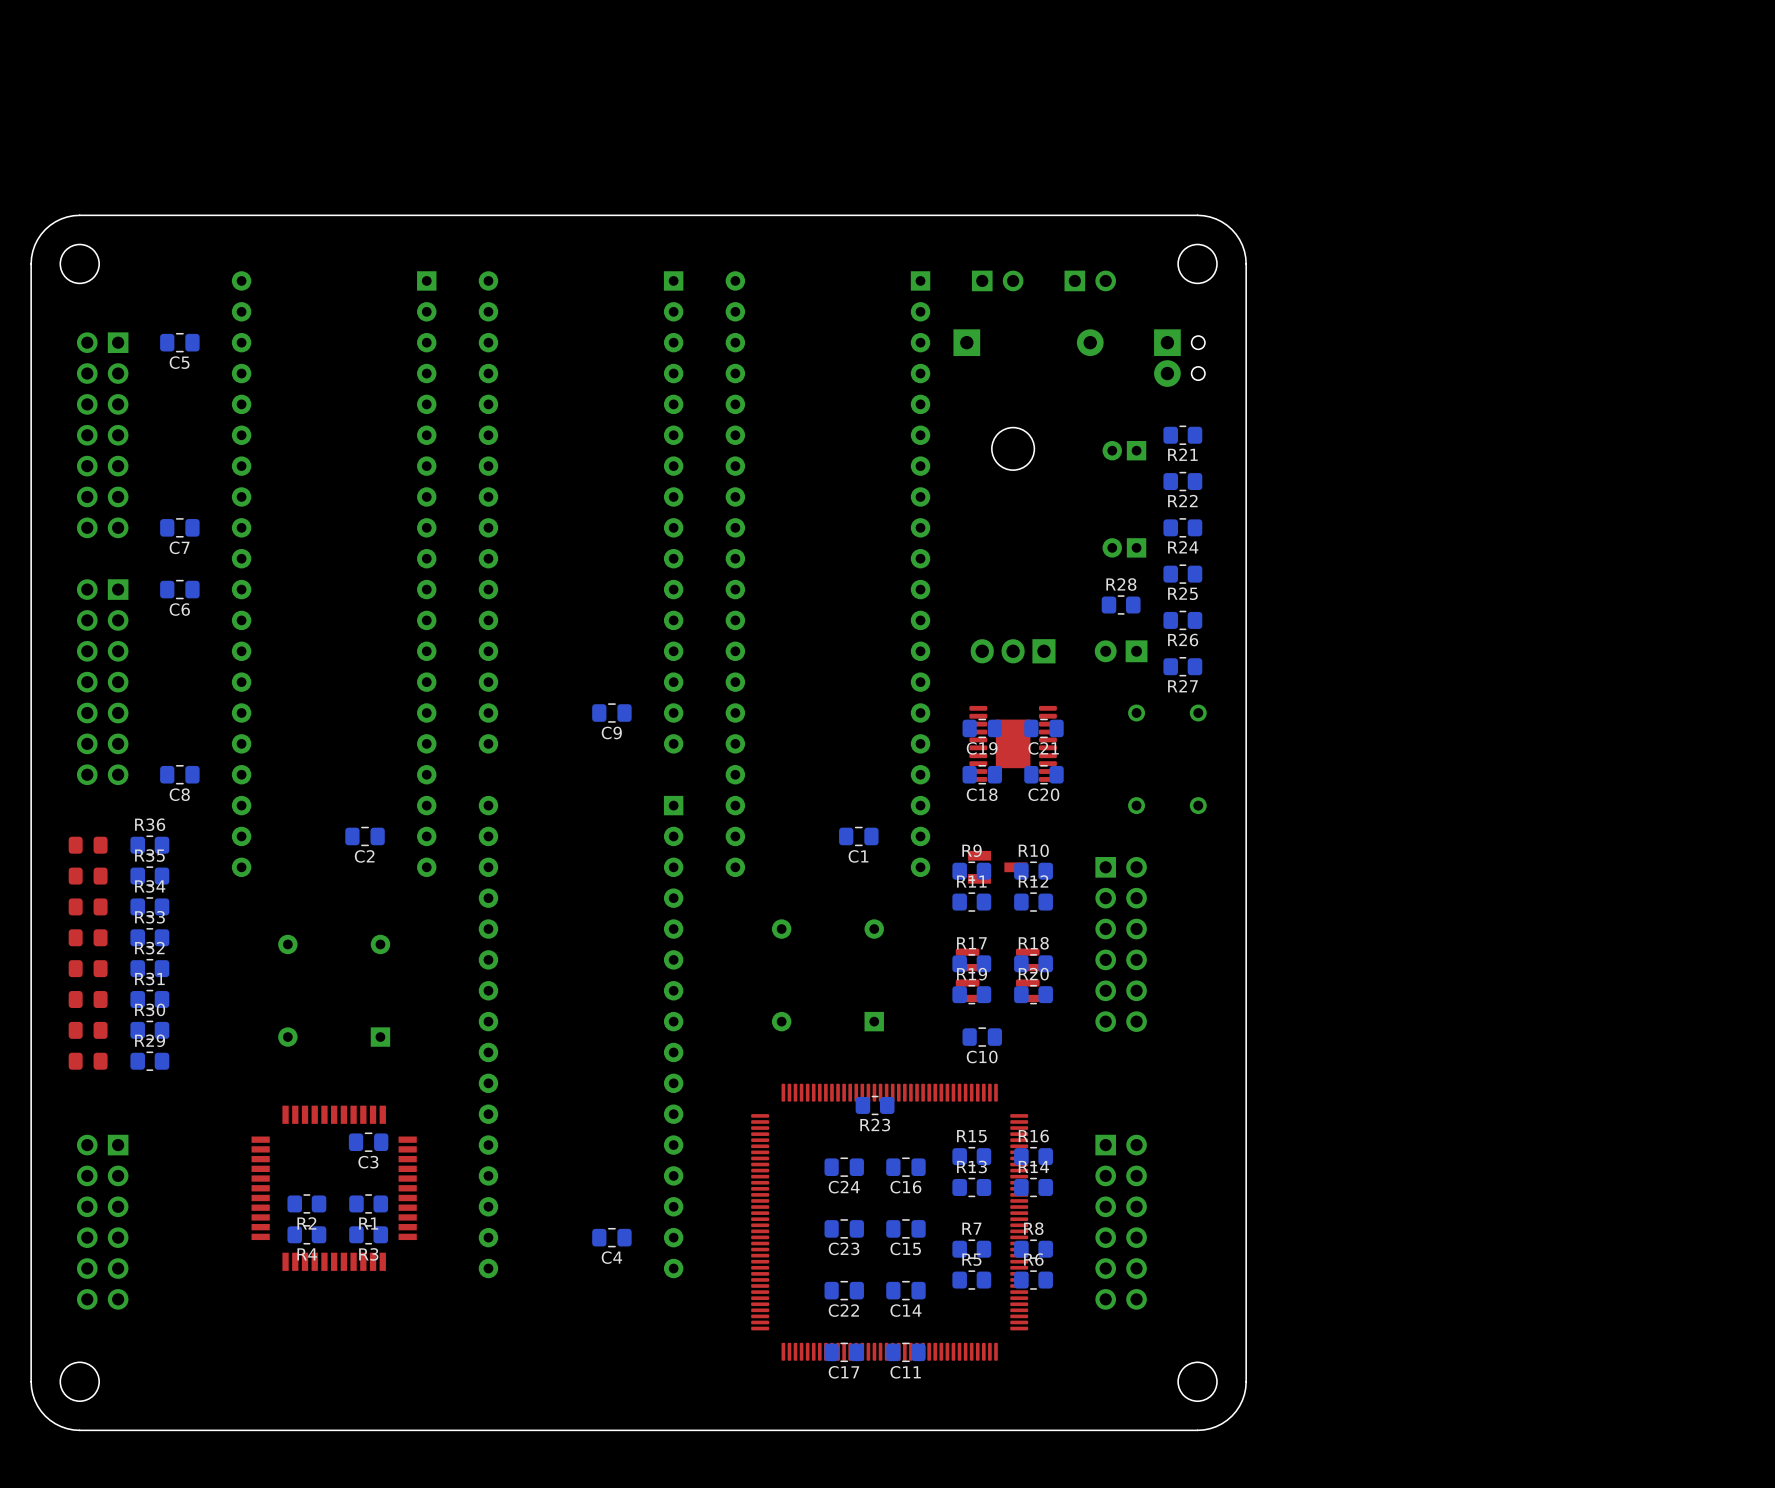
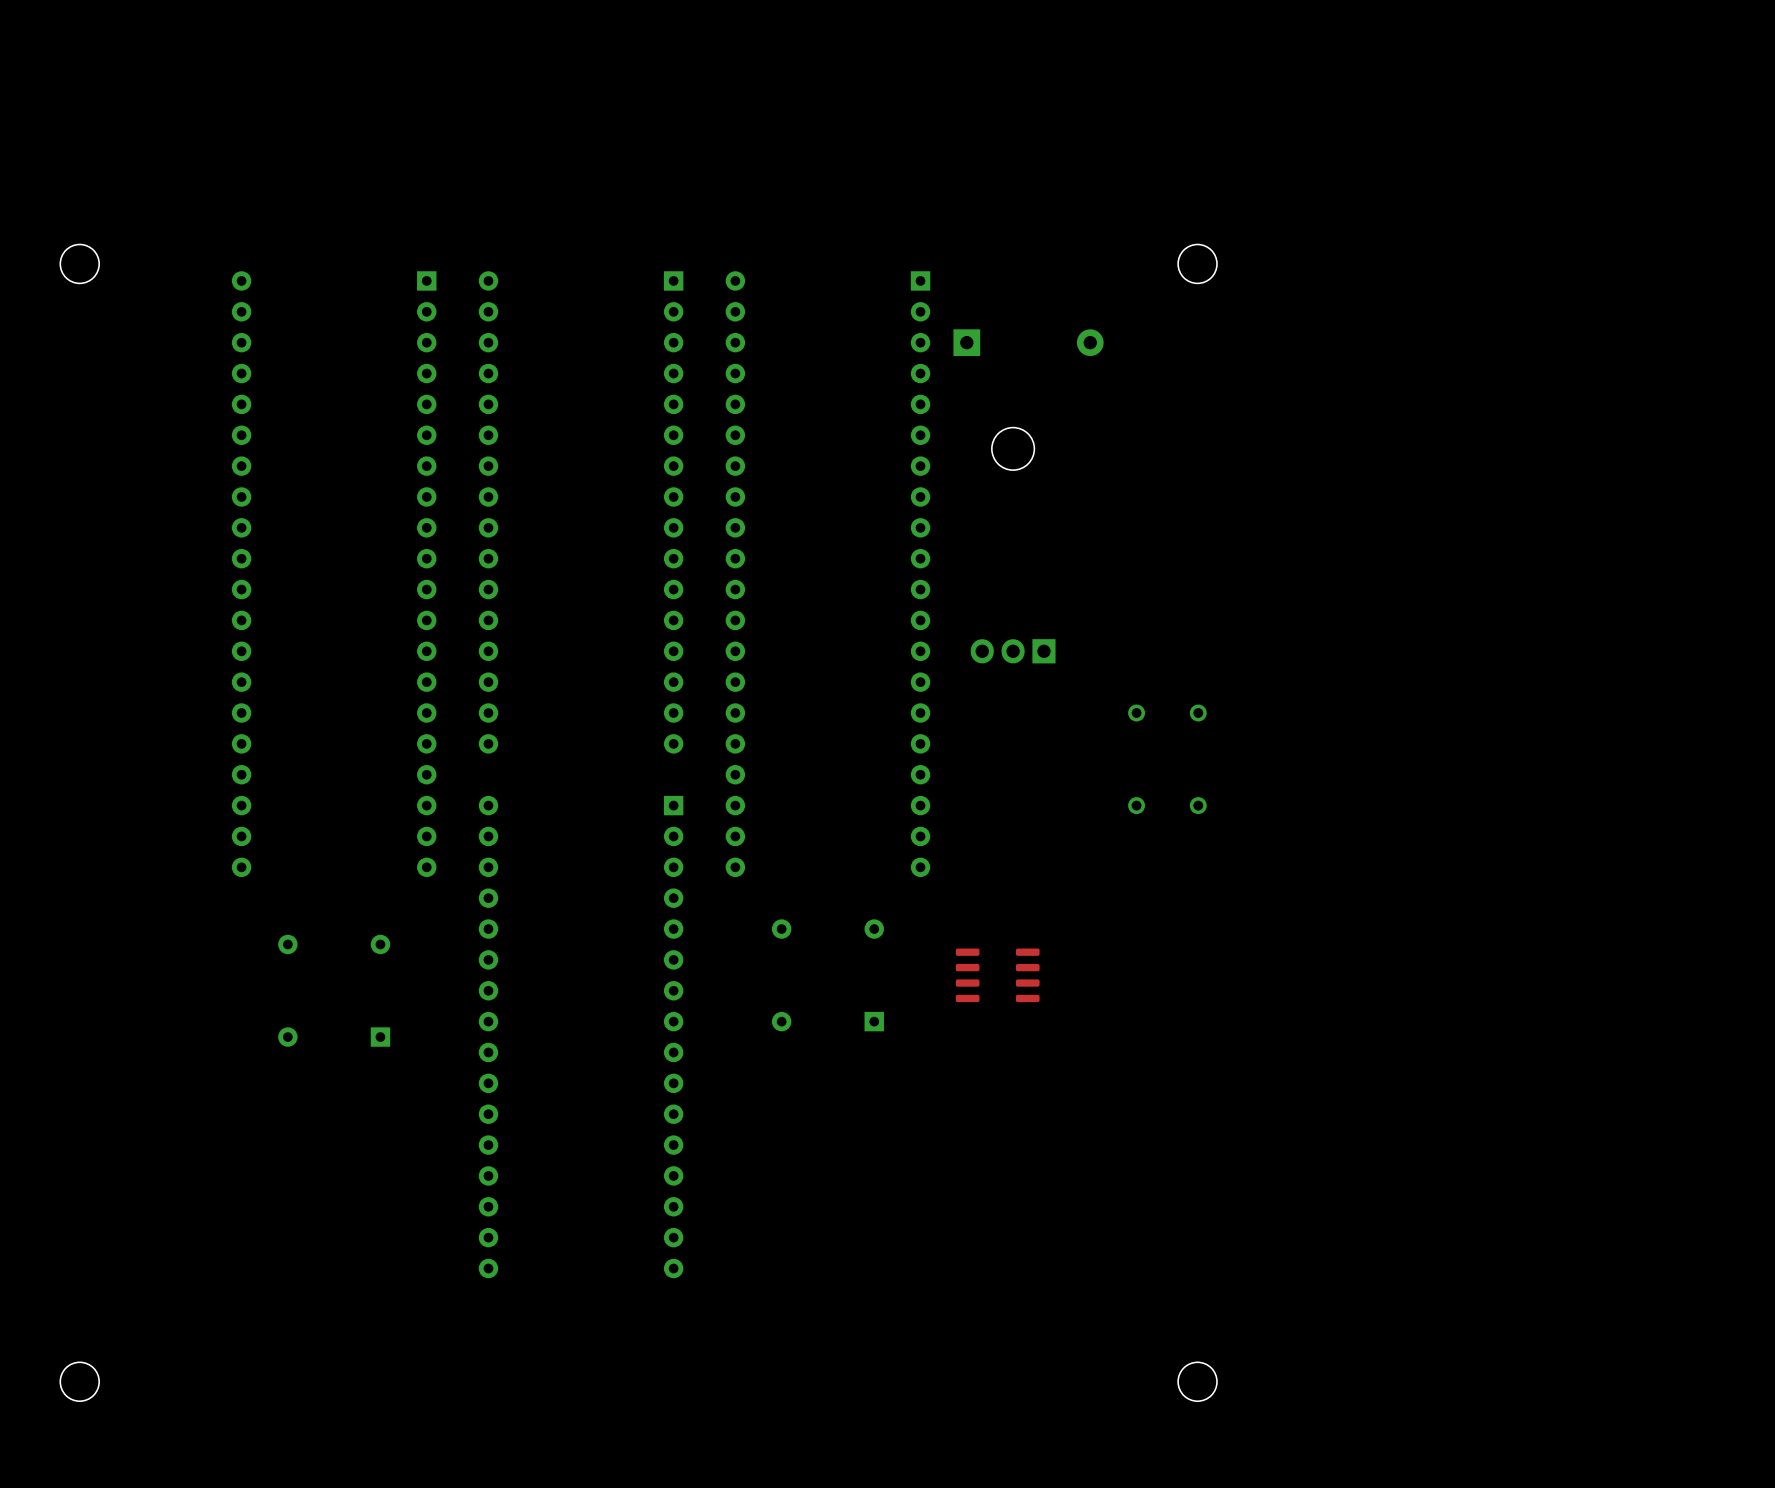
board edge: (1197, 215) (79, 215) (61, 219) (45, 229) (34, 245) (31, 263) (31, 1381) (34, 1400) (45, 1416) (61, 1426) (79, 1430) (1197, 1430) (1216, 1426) (1231, 1416) (1242, 1400) (1246, 1381) (1246, 263) (1242, 245) (1231, 229) (1216, 219) (1197, 215) -> none
part: (997, 280) -> none
part: (1090, 280) -> none
C5: (179, 342) -> none
part: (1179, 358) -> none
part: (102, 435) -> none
R21: (1182, 435) -> none
part: (1124, 450) -> none
R22: (1182, 481) -> none
C7: (179, 527) -> none
R24: (1182, 527) -> none
part: (1124, 547) -> none
R25: (1182, 574) -> none
C6: (179, 589) -> none
R28: (1121, 604) -> none
R26: (1182, 620) -> none
part: (1121, 651) -> none
R27: (1182, 666) -> none
part: (102, 682) -> none
C9: (611, 713) -> none
C19: (982, 728) -> none
C21: (1043, 728) -> none
part: (1013, 743) -> none
C8: (179, 774) -> none
C18: (982, 774) -> none
C20: (1043, 774) -> none
C2: (365, 836) -> none
C1: (858, 836) -> none
part: (88, 845) -> none
R36: (149, 845) -> none
part: (997, 867) -> none
R9: (971, 871) -> none
R10: (1033, 871) -> none
part: (88, 876) -> none
R35: (149, 876) -> none
R11: (971, 902) -> none
R12: (1033, 902) -> none
part: (88, 906) -> none
R34: (149, 906) -> none
part: (88, 937) -> none
R33: (149, 937) -> none
part: (1121, 944) -> none
R17: (971, 963) -> none
R18: (1033, 963) -> none
part: (88, 968) -> none
R32: (149, 968) -> none
R19: (971, 994) -> none
R20: (1033, 994) -> none
part: (88, 999) -> none
R31: (149, 999) -> none
part: (88, 1030) -> none
R30: (149, 1030) -> none
C10: (982, 1037) -> none
part: (88, 1061) -> none
R29: (149, 1061) -> none
R23: (875, 1105) -> none
C3: (368, 1142) -> none
R15: (971, 1156) -> none
R16: (1033, 1156) -> none
C24: (844, 1167) -> none
C16: (905, 1167) -> none
R13: (971, 1187) -> none
R14: (1033, 1187) -> none
part: (334, 1188) -> none
R2: (306, 1203) -> none
R1: (368, 1203) -> none
part: (102, 1222) -> none
part: (889, 1222) -> none
part: (1121, 1222) -> none
C23: (844, 1228) -> none
C15: (905, 1228) -> none
R4: (306, 1234) -> none
R3: (368, 1234) -> none
C4: (611, 1237) -> none
R7: (971, 1249) -> none
R8: (1033, 1249) -> none
R5: (971, 1280) -> none
R6: (1033, 1280) -> none
C22: (844, 1290) -> none
C14: (905, 1290) -> none
C17: (844, 1352) -> none
C11: (905, 1352) -> none

